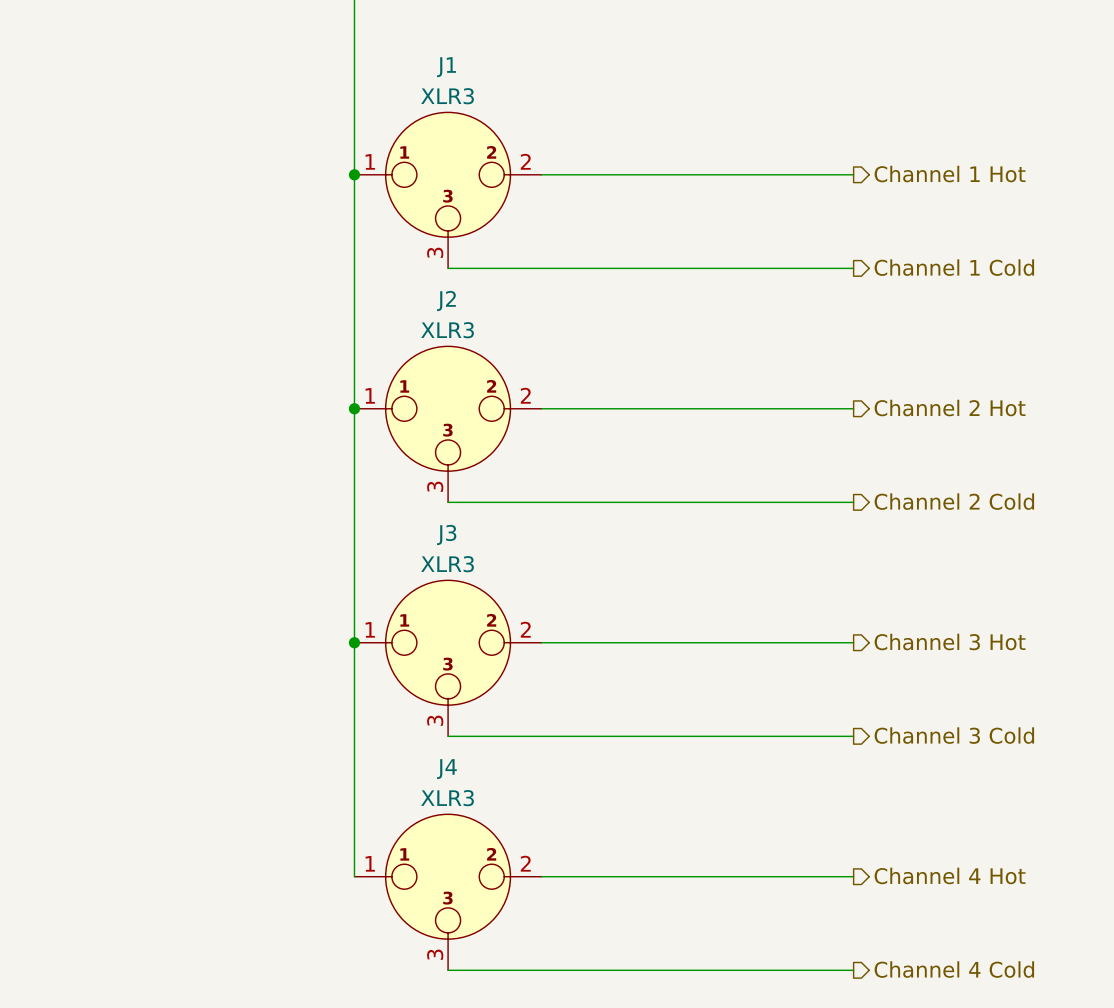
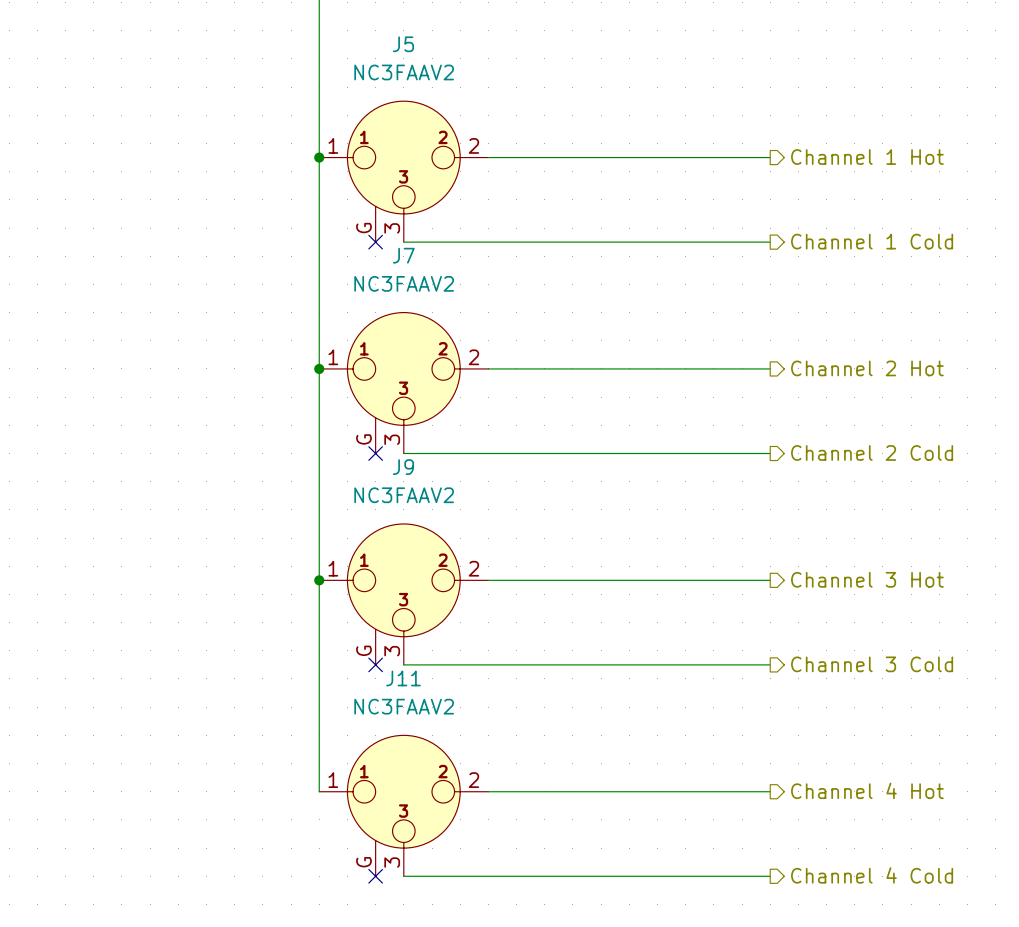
J1: XLR3 (448, 190) -> none
J5: none -> NC3FAAV2 (403, 171)
no-connect mark: none -> (375, 242)
J2: XLR3 (448, 424) -> none
J7: none -> NC3FAAV2 (403, 383)
no-connect mark: none -> (375, 453)
J3: XLR3 (448, 658) -> none
J9: none -> NC3FAAV2 (403, 594)
no-connect mark: none -> (375, 664)
J4: XLR3 (448, 892) -> none
J11: none -> NC3FAAV2 (403, 805)
no-connect mark: none -> (375, 876)

